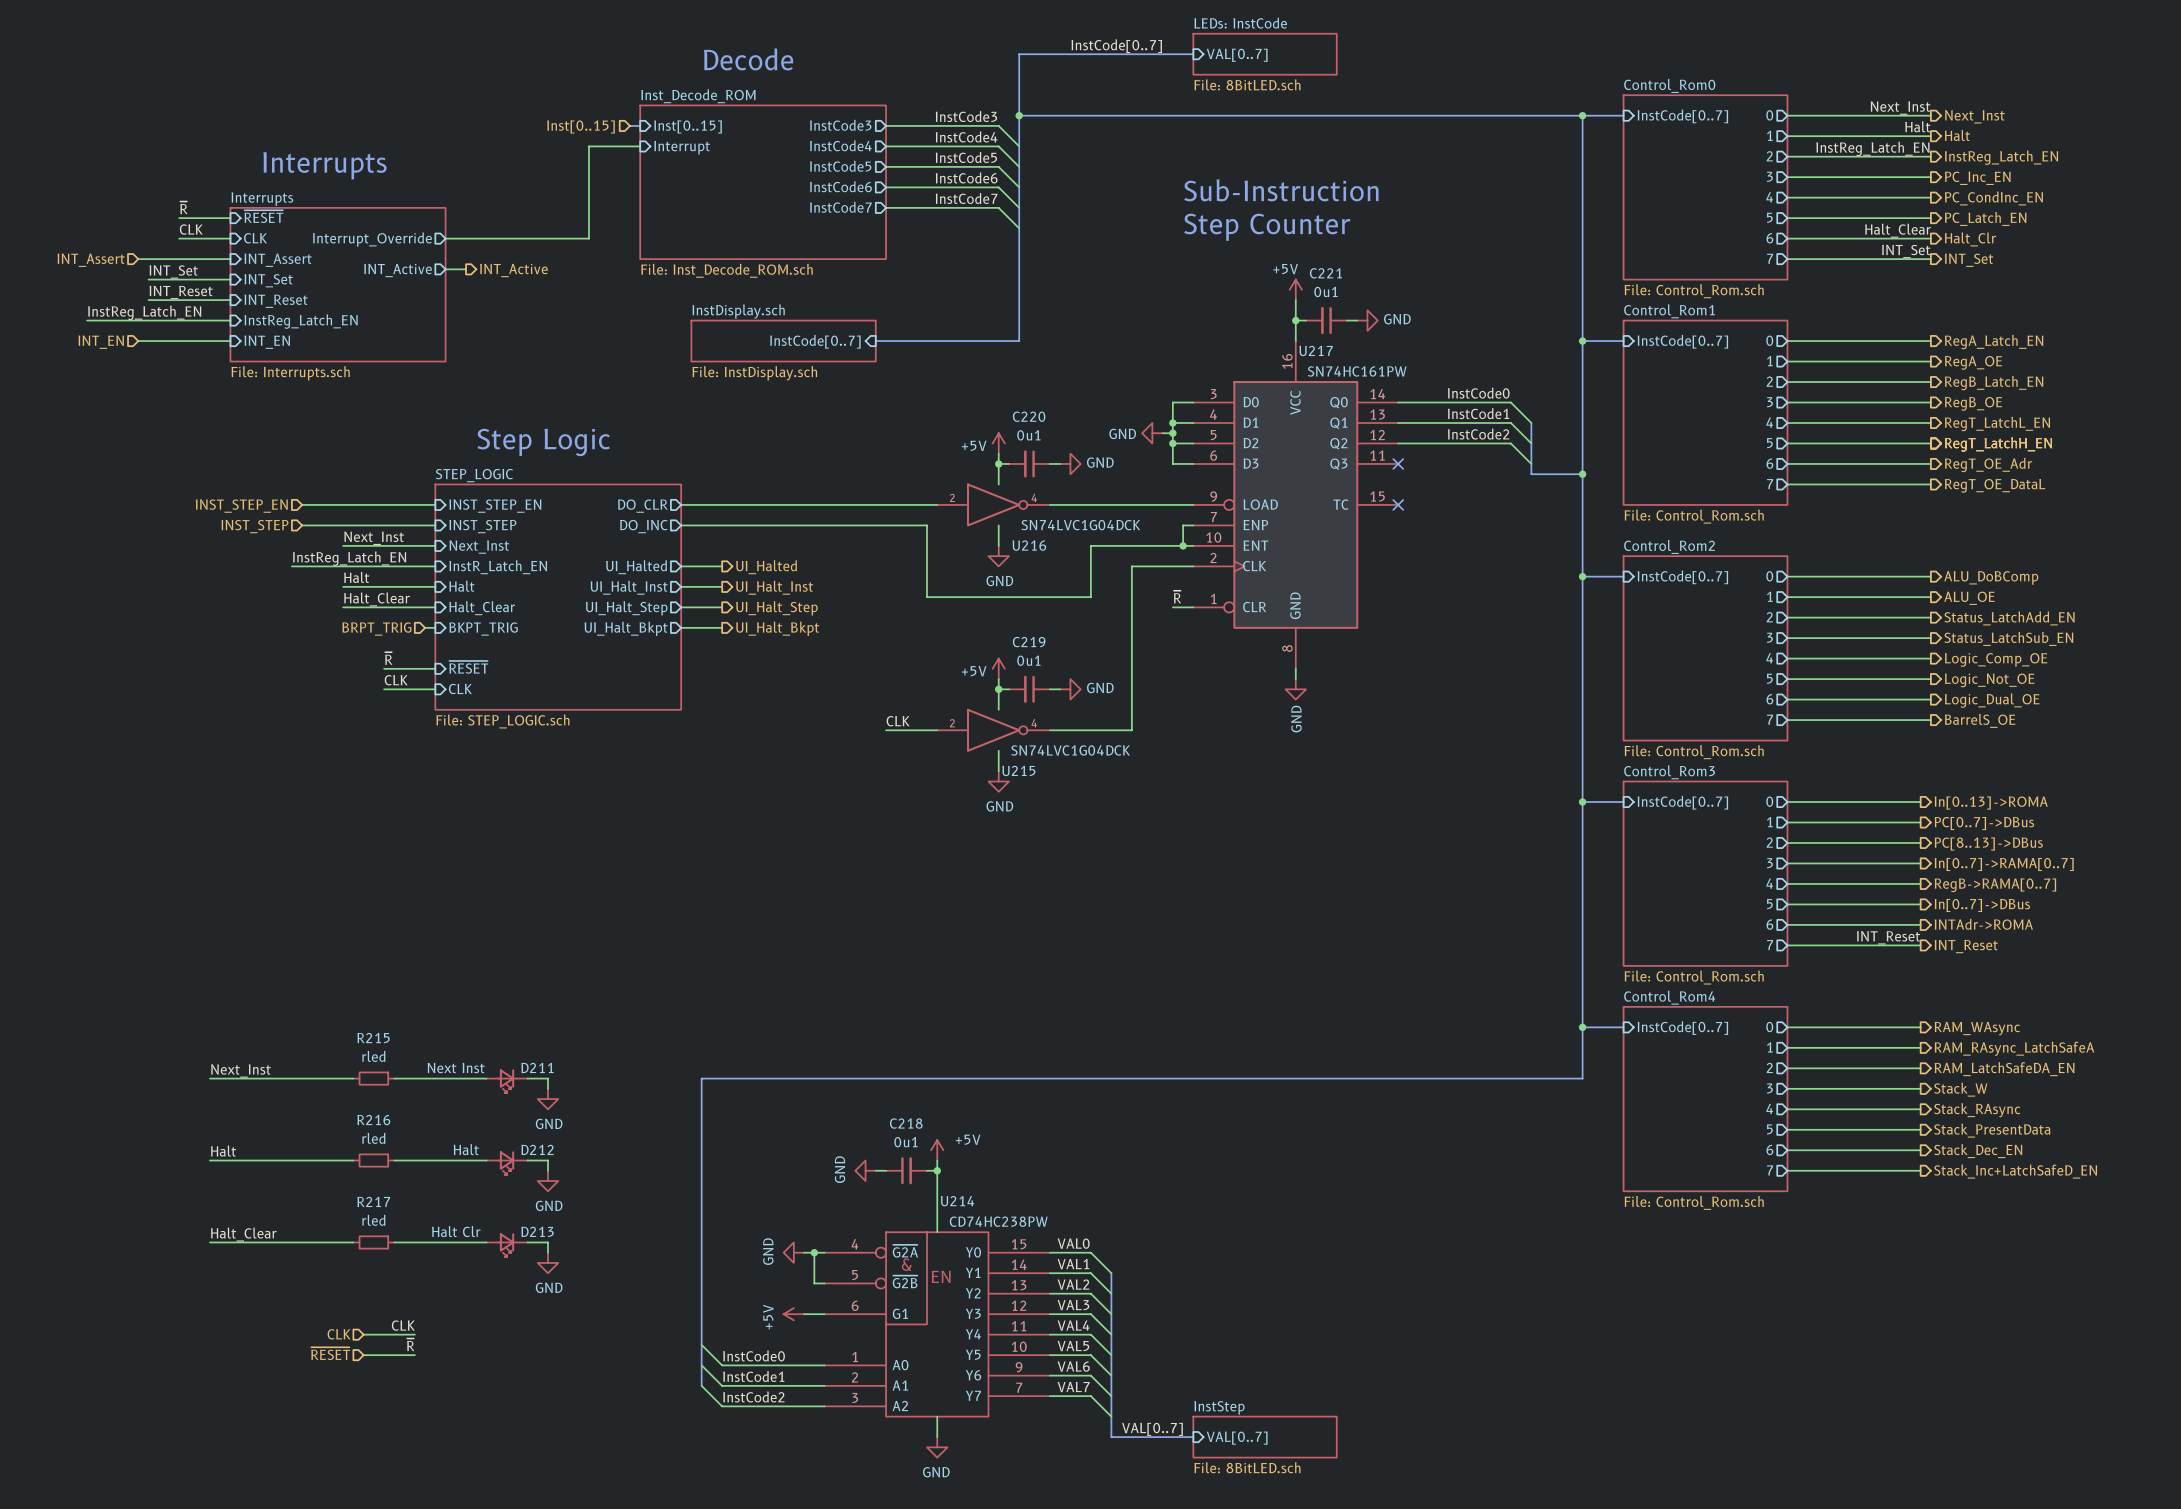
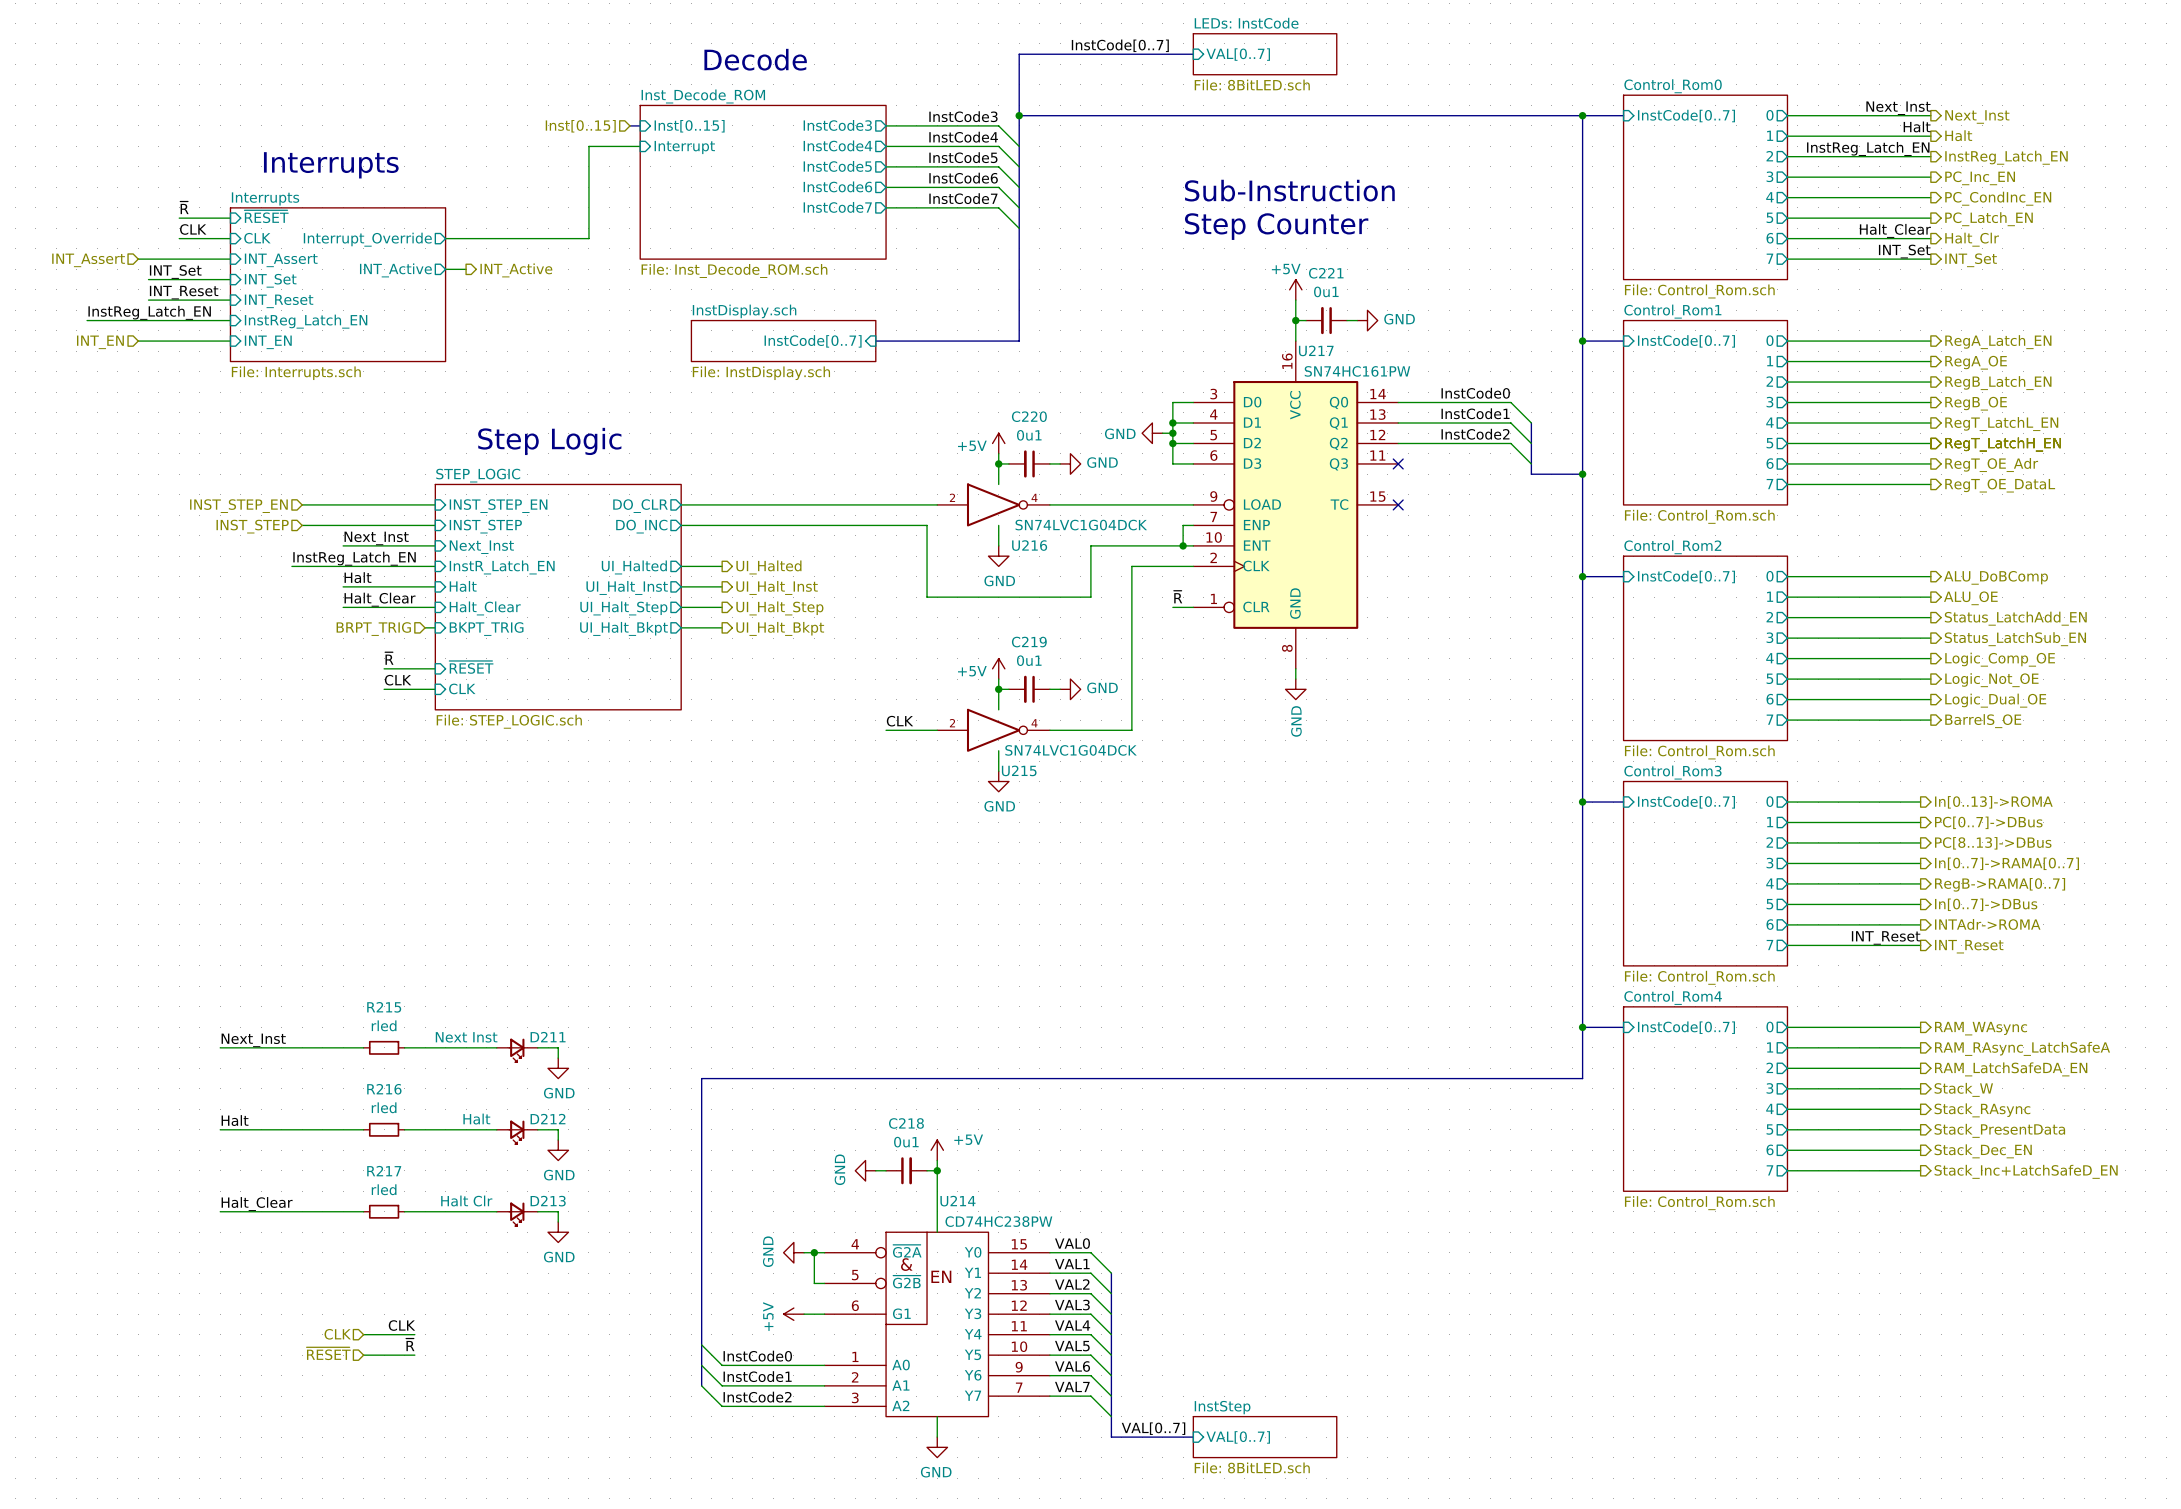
power symbol: none -> GND (558, 1068)
label position: Next_Inst (240, 1070) -> Next_Inst (253, 1040)
wire: (209, 1078) (353, 1078) -> (220, 1047) (363, 1047)
R215 position: (373, 1078) -> (384, 1047)
wire: (394, 1078) (486, 1078) -> (404, 1047) (496, 1047)
wire: (527, 1078) (548, 1078) (548, 1088) -> (537, 1047) (558, 1047) (558, 1058)
D211 position: (507, 1081) -> (517, 1050)
power symbol: GND (548, 1099) -> none
power symbol: none -> GND (558, 1150)
label position: Halt (223, 1151) -> Halt (235, 1120)
wire: (209, 1160) (353, 1160) -> (220, 1129) (363, 1129)
R216 position: (373, 1160) -> (384, 1129)
wire: (394, 1160) (486, 1160) -> (404, 1129) (496, 1129)
wire: (527, 1160) (548, 1160) (548, 1170) -> (537, 1129) (558, 1129) (558, 1140)
D212 position: (507, 1163) -> (517, 1132)
power symbol: GND (548, 1181) -> none
power symbol: none -> GND (558, 1232)
label position: Halt_Clear (243, 1234) -> Halt_Clear (257, 1204)
wire: (209, 1242) (353, 1242) -> (220, 1211) (363, 1211)
R217 position: (373, 1242) -> (384, 1211)
wire: (394, 1242) (486, 1242) -> (404, 1211) (496, 1211)
wire: (527, 1242) (548, 1242) (548, 1252) -> (537, 1211) (558, 1211) (558, 1221)
D213 position: (507, 1245) -> (517, 1214)
power symbol: GND (548, 1262) -> none

